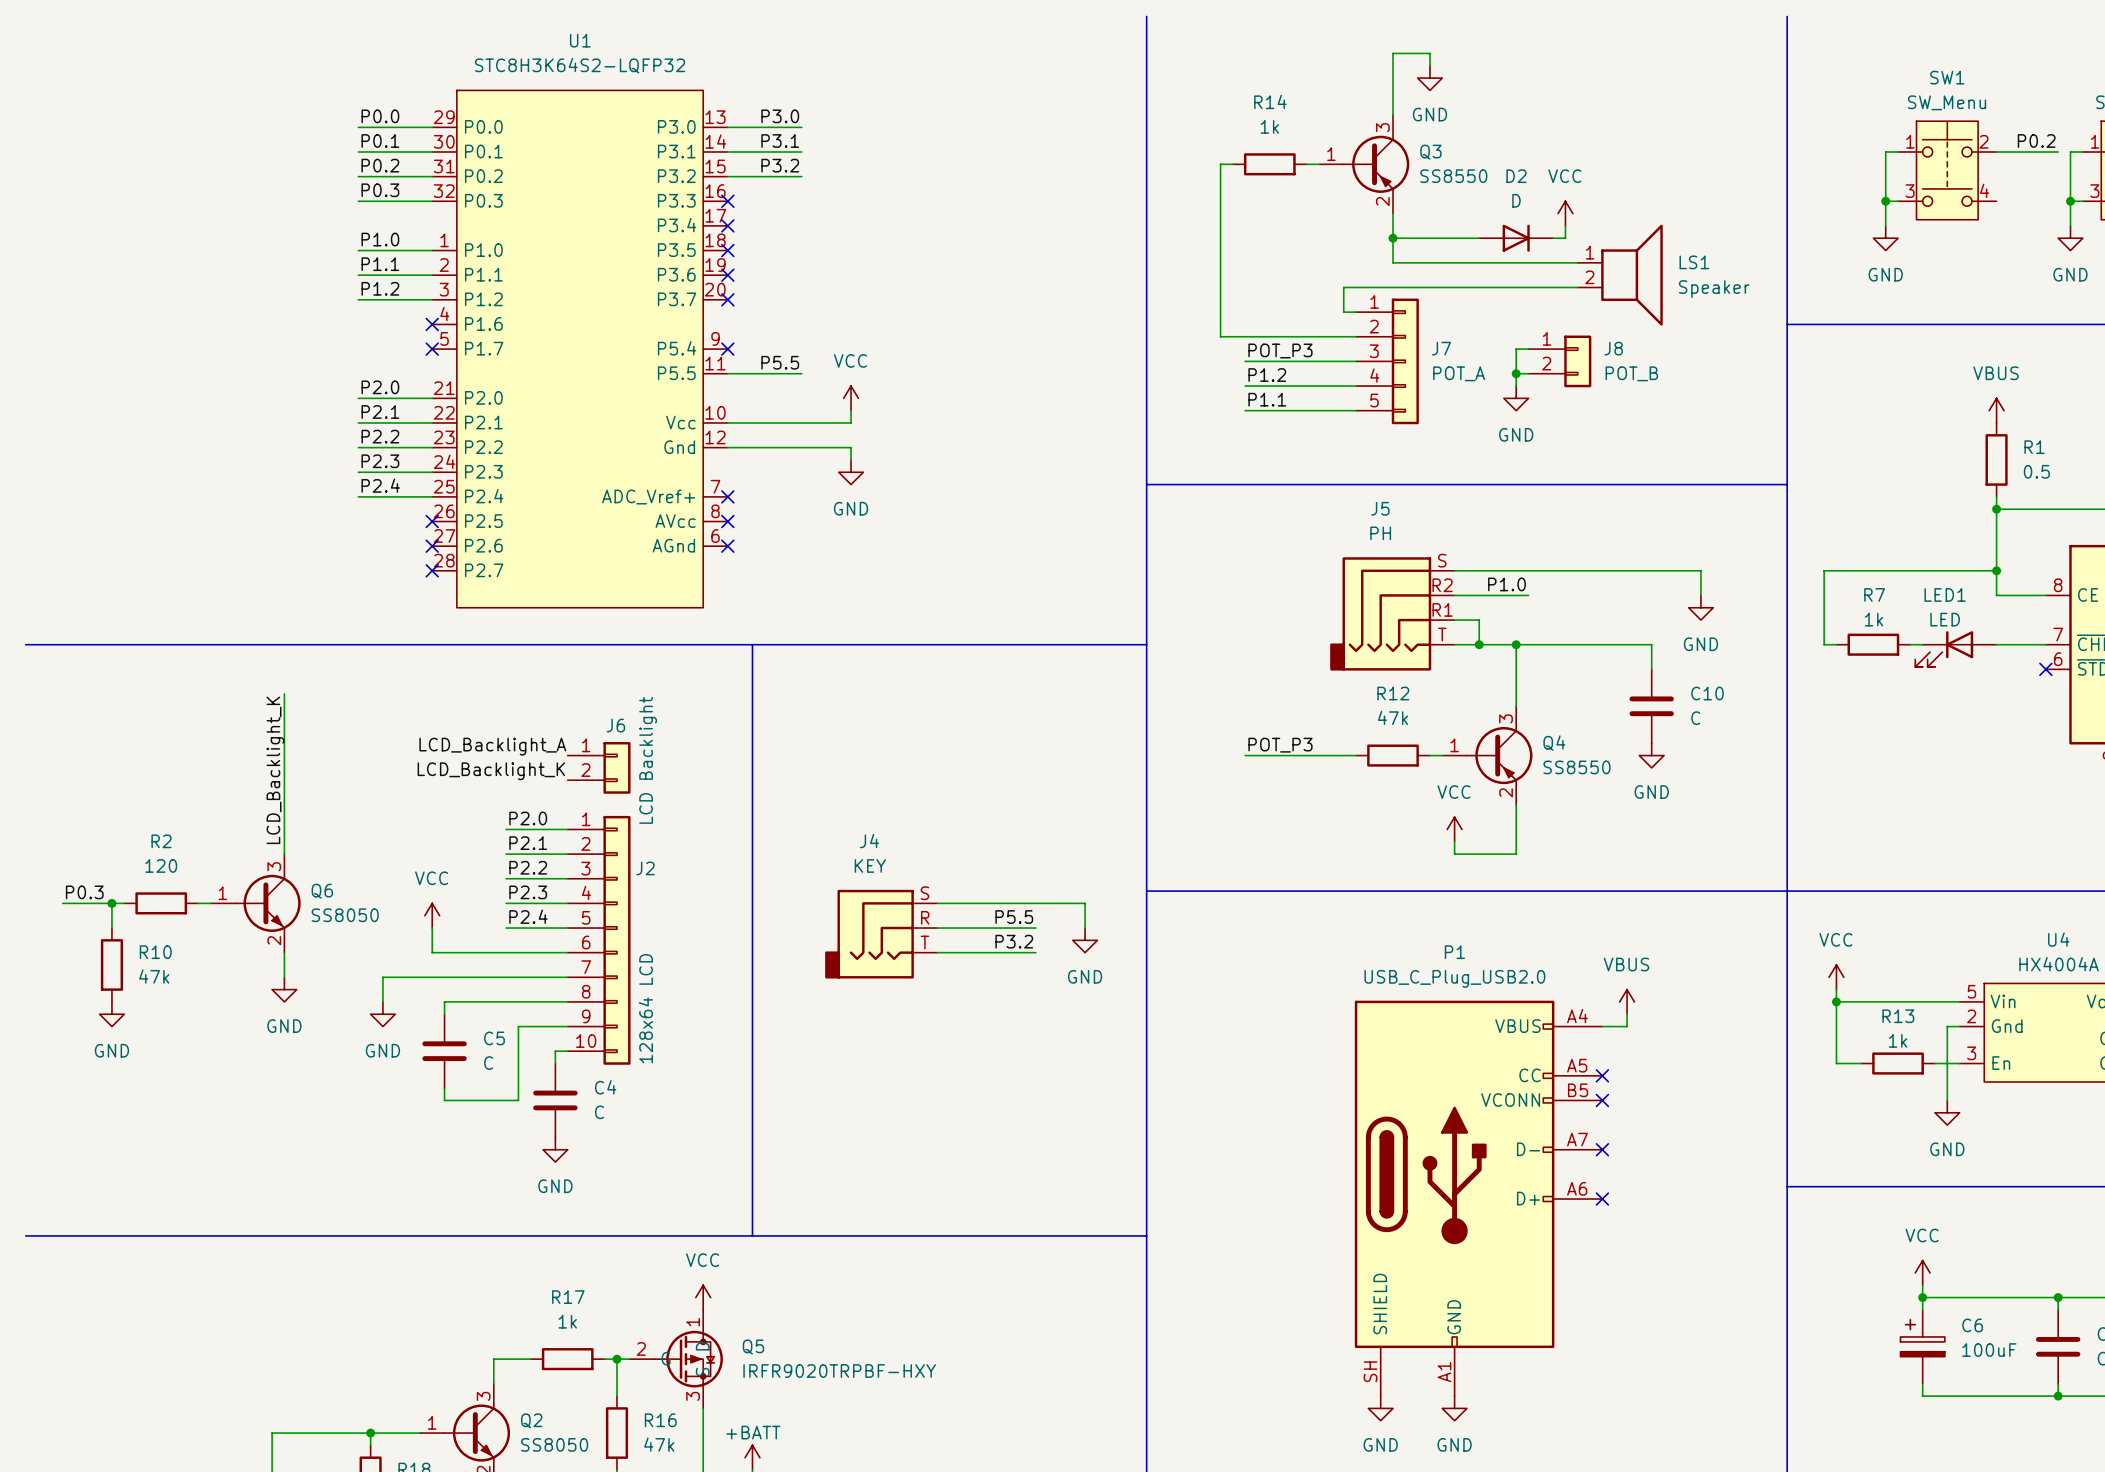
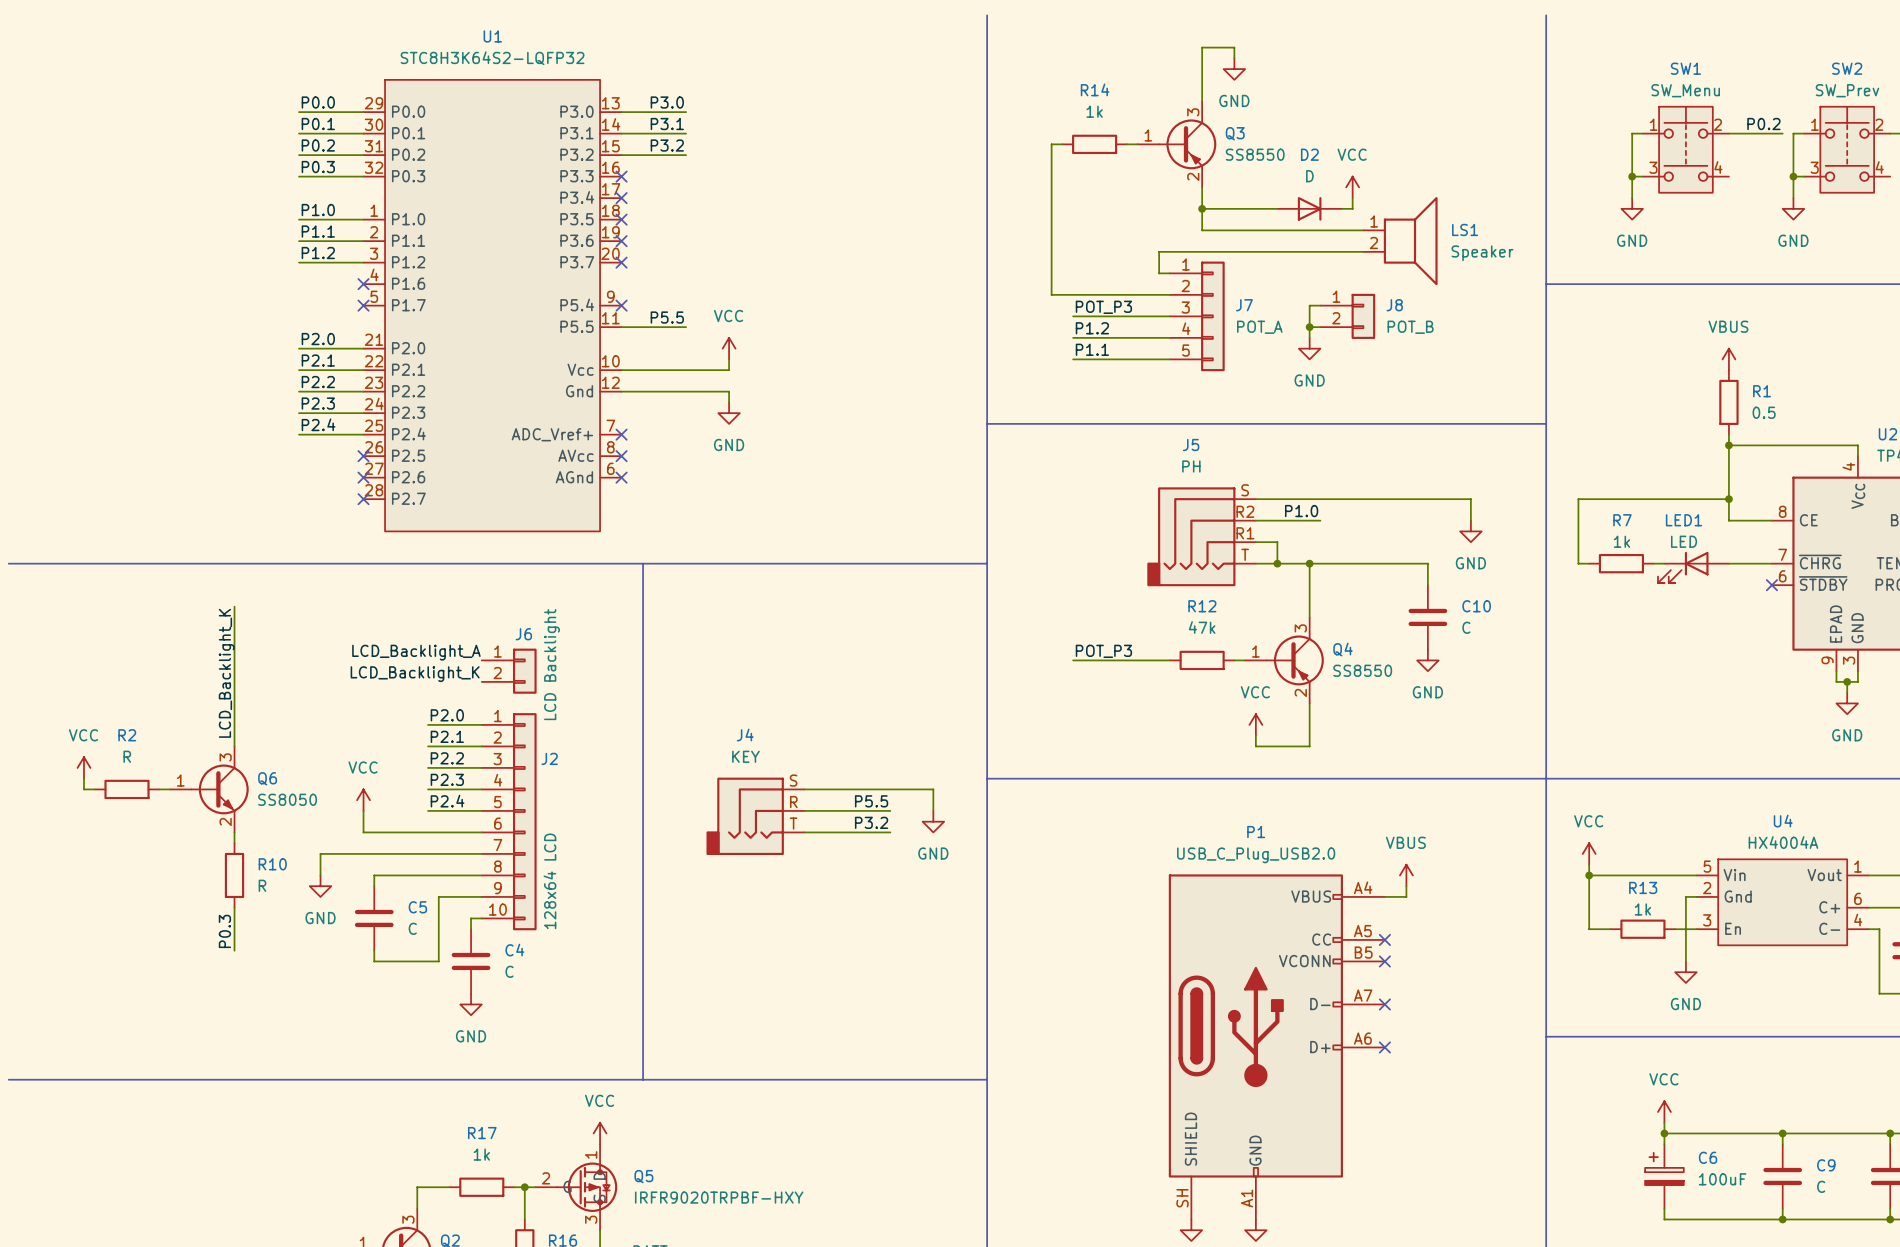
R2 value: 120 (161, 865) -> R (127, 756)
power symbol: none -> VCC (83, 767)
label: P0.3 (84, 892) -> none
wire: (62, 903) (111, 903) (111, 928) -> none
junction: (111, 903) -> none
R10 position: (111, 964) -> (234, 875)
R10 value: 47k (154, 976) -> R (262, 885)
power symbol: GND (284, 989) -> none
power symbol: GND (111, 1014) -> none
wire: none -> (234, 907) (234, 950)
label: none -> P0.3 (224, 931)

